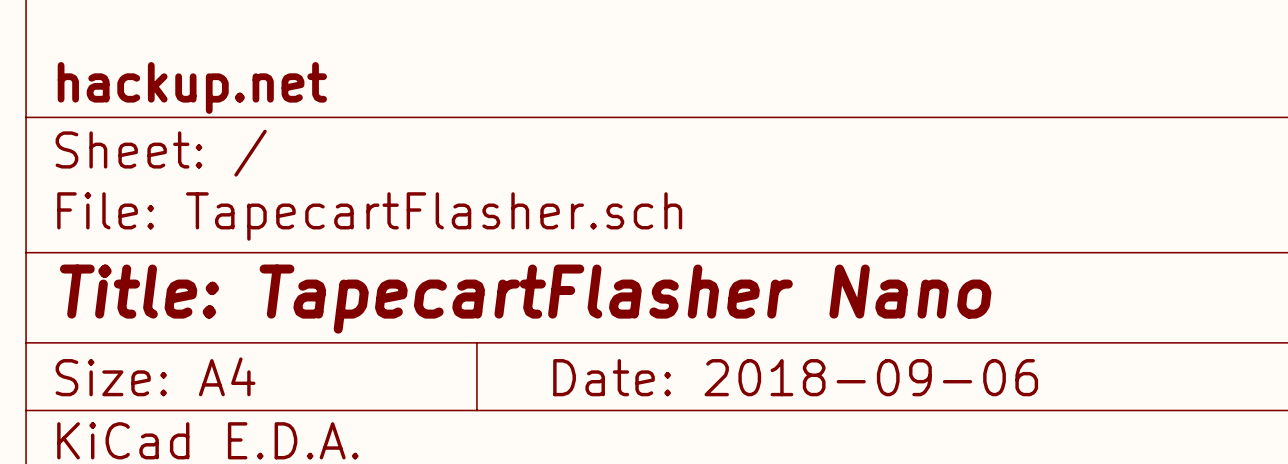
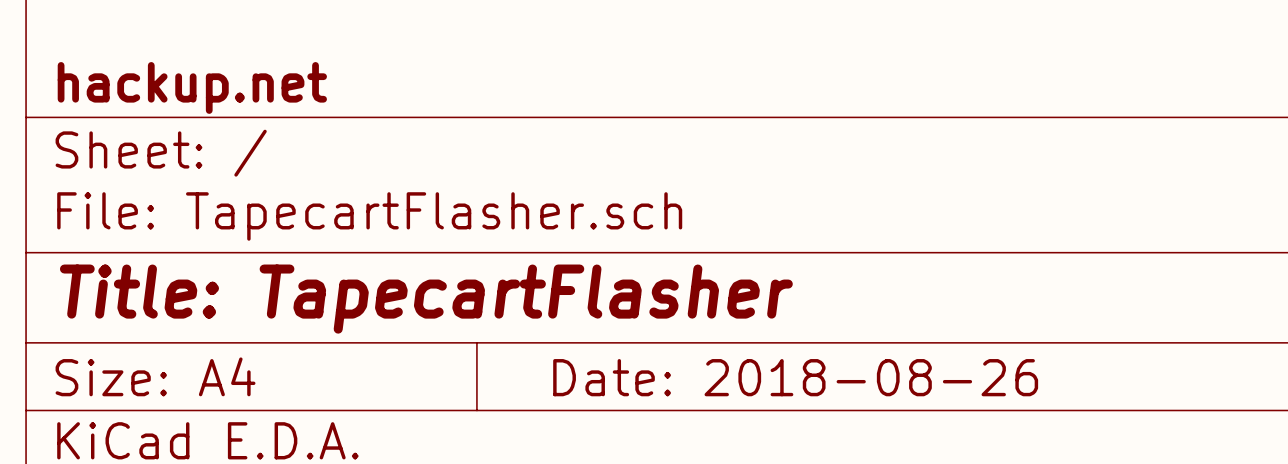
title block: Title: TapecartFlasher Nano (525, 299) -> Title: TapecartFlasher (426, 299)
title block: Date: 2018-09-06 (795, 377) -> Date: 2018-08-26 (795, 377)

